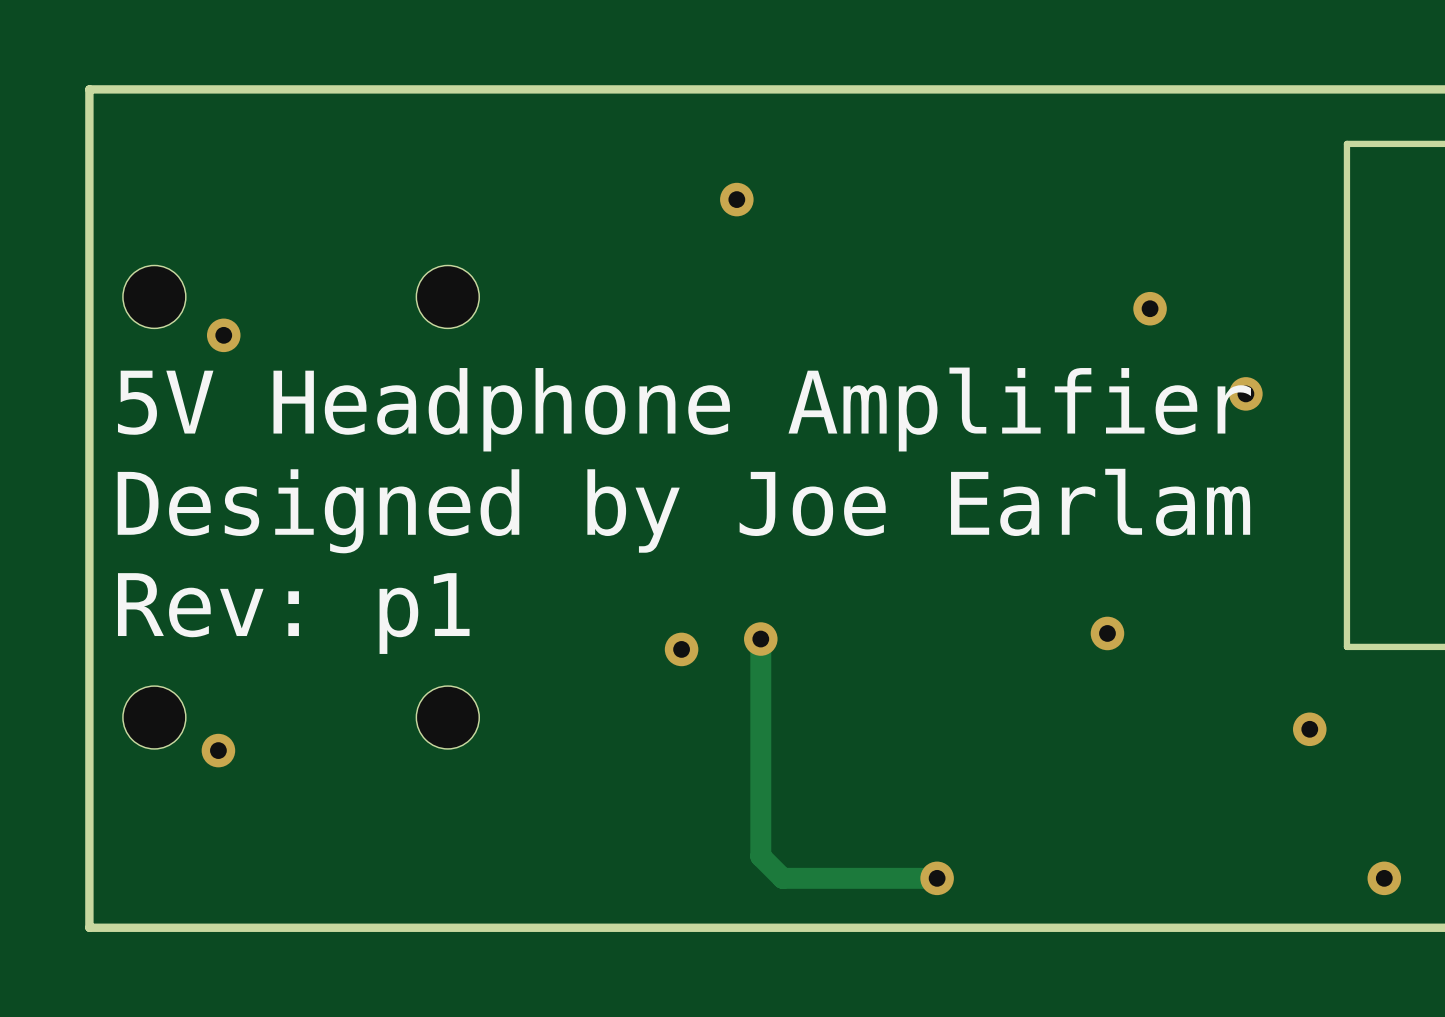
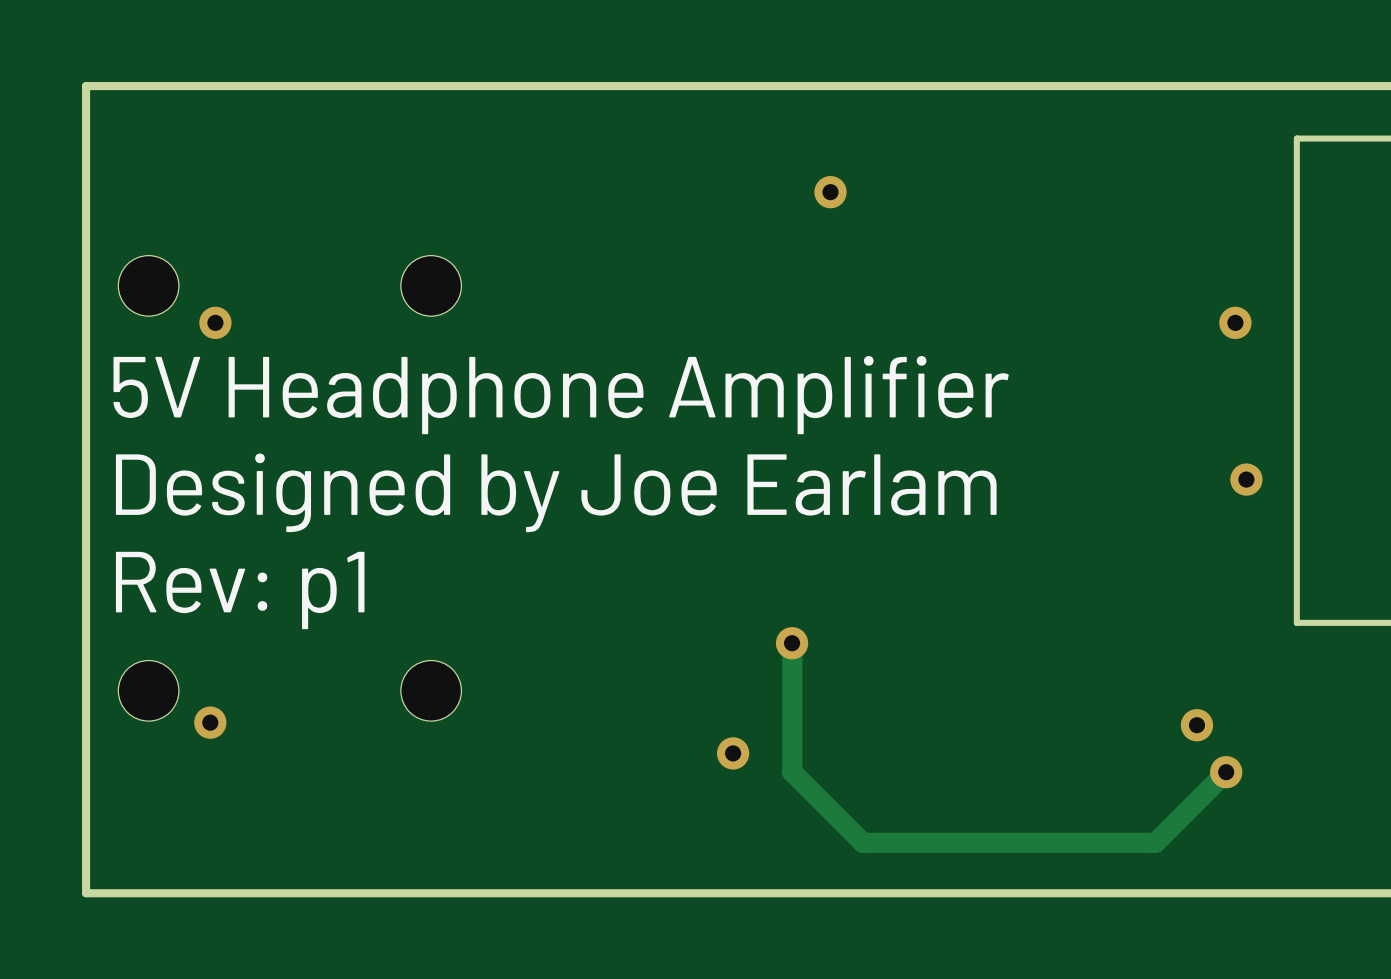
via position: (736, 199) -> (830, 192)
via: (1150, 308) -> none
via: none -> (1235, 322)
via: (1245, 393) -> none
via: none -> (1246, 479)
via: (1107, 633) -> none
track: (760, 639) (760, 856) (782, 878) (937, 878) -> none
via position: (760, 639) -> (792, 643)
via: (681, 649) -> none
track: none -> (792, 643) (792, 772) (862, 842) (1155, 842) (1226, 772)
via: (1309, 729) -> none
via: none -> (1196, 725)
via: none -> (733, 753)
via: none -> (1226, 772)
via: (937, 878) -> none
via: (1384, 878) -> none

